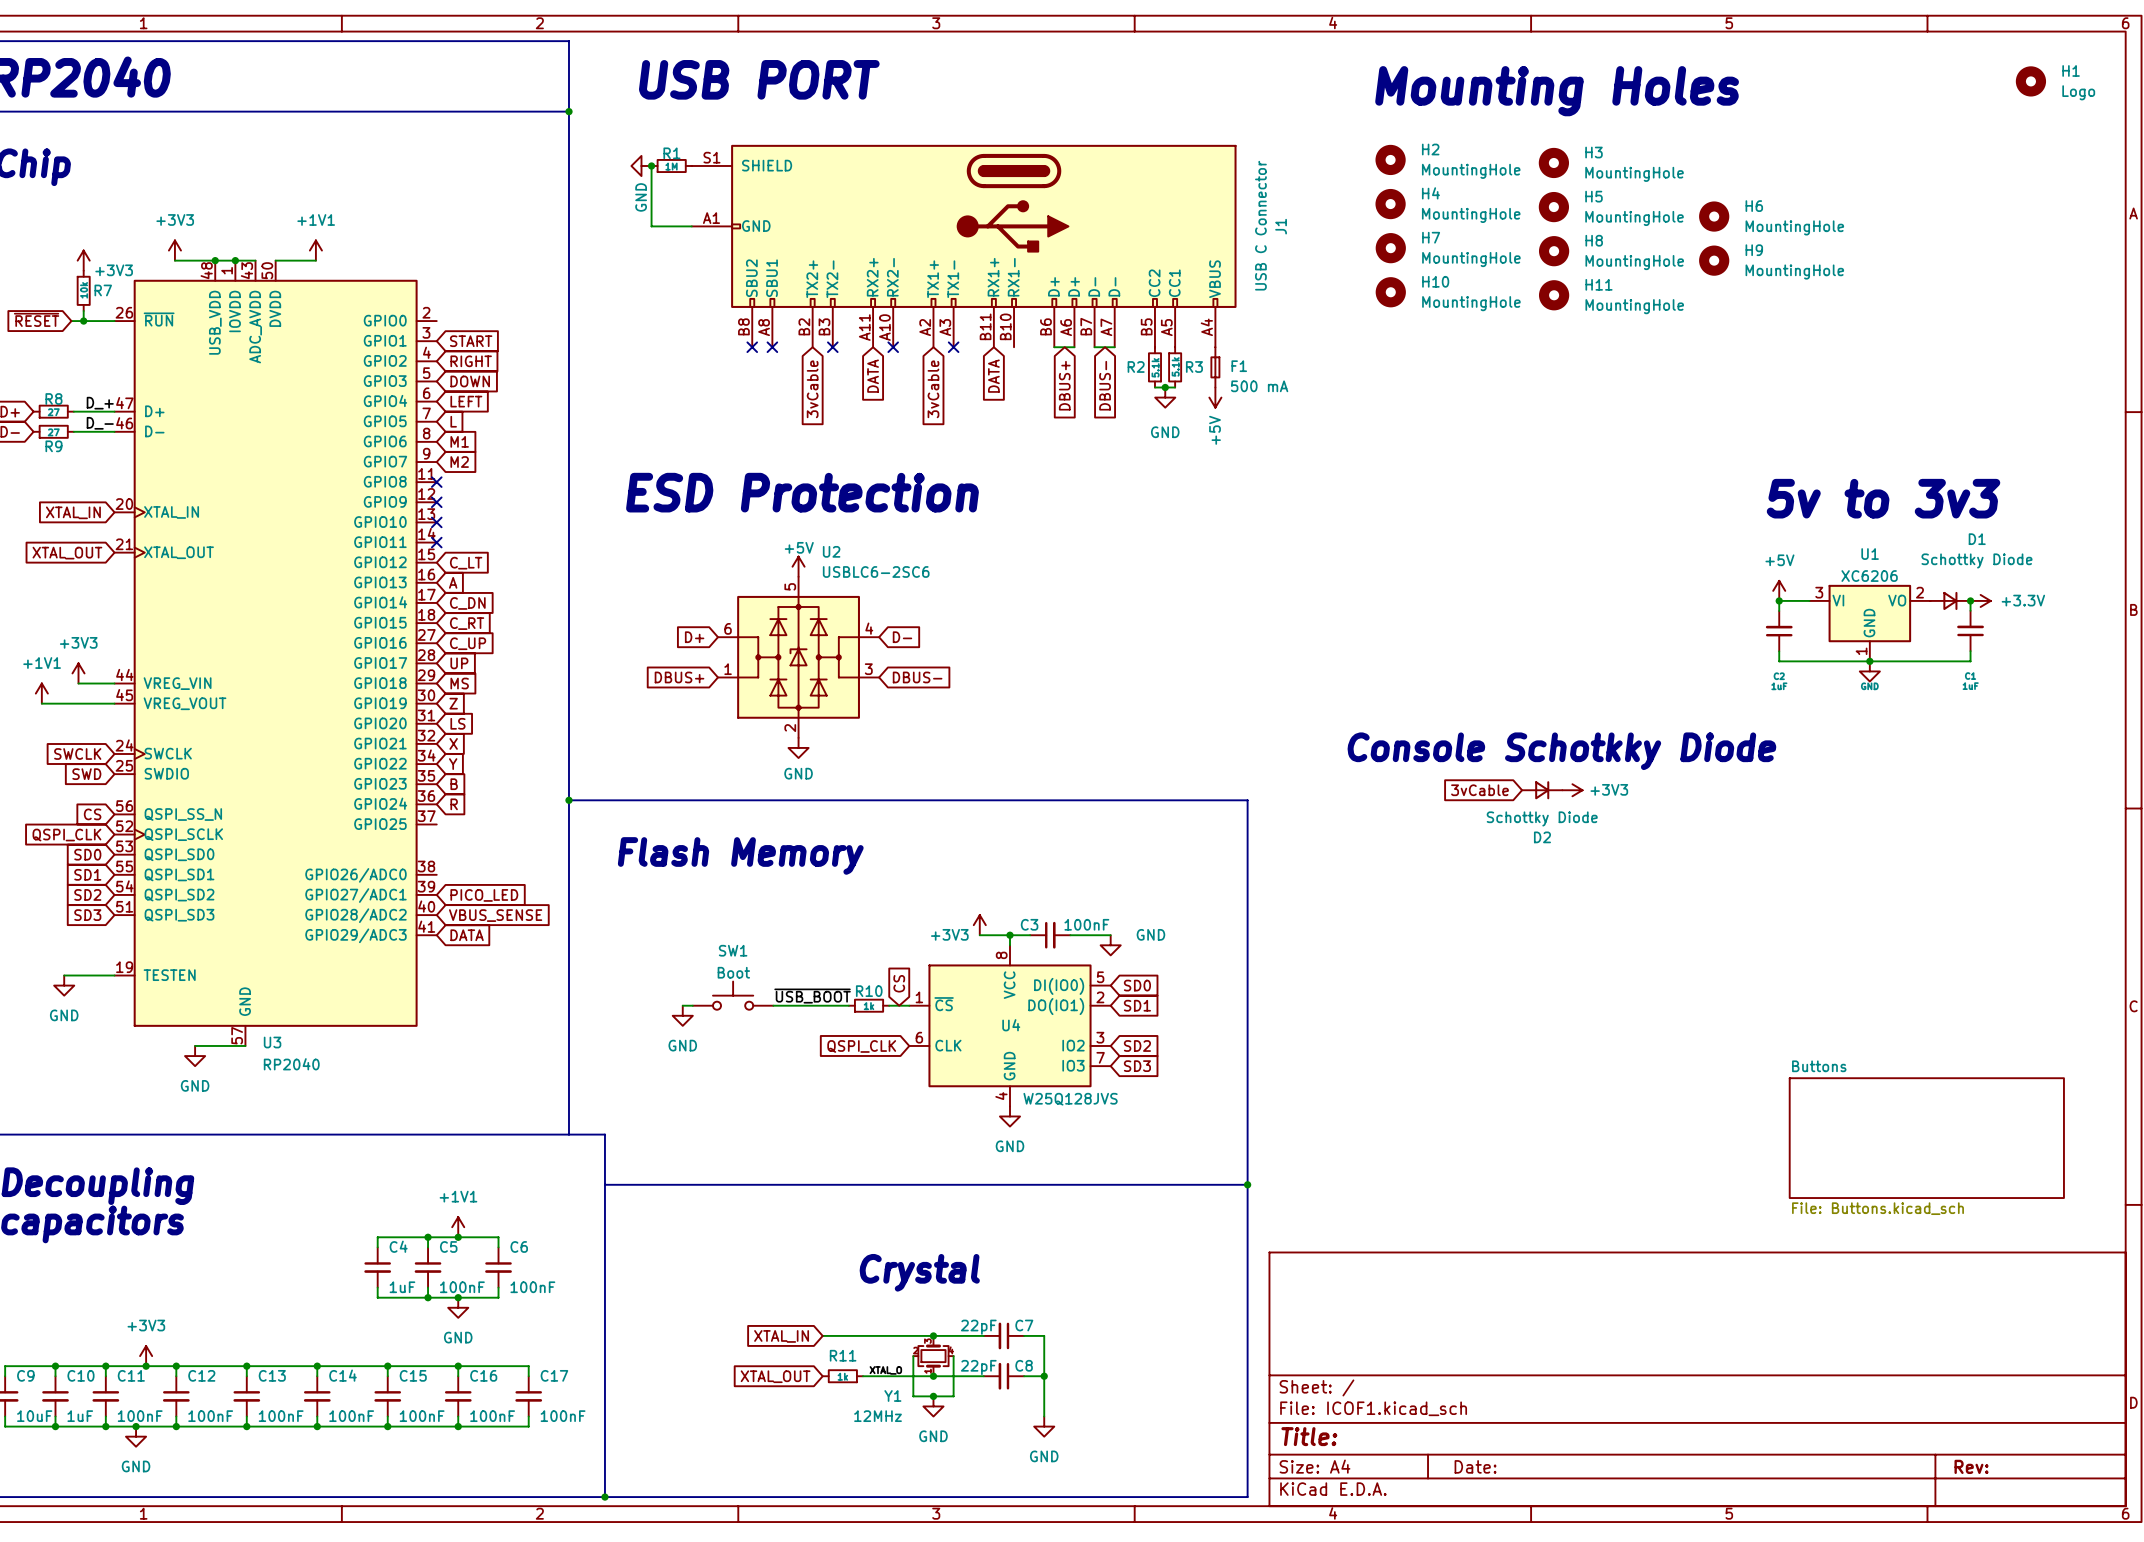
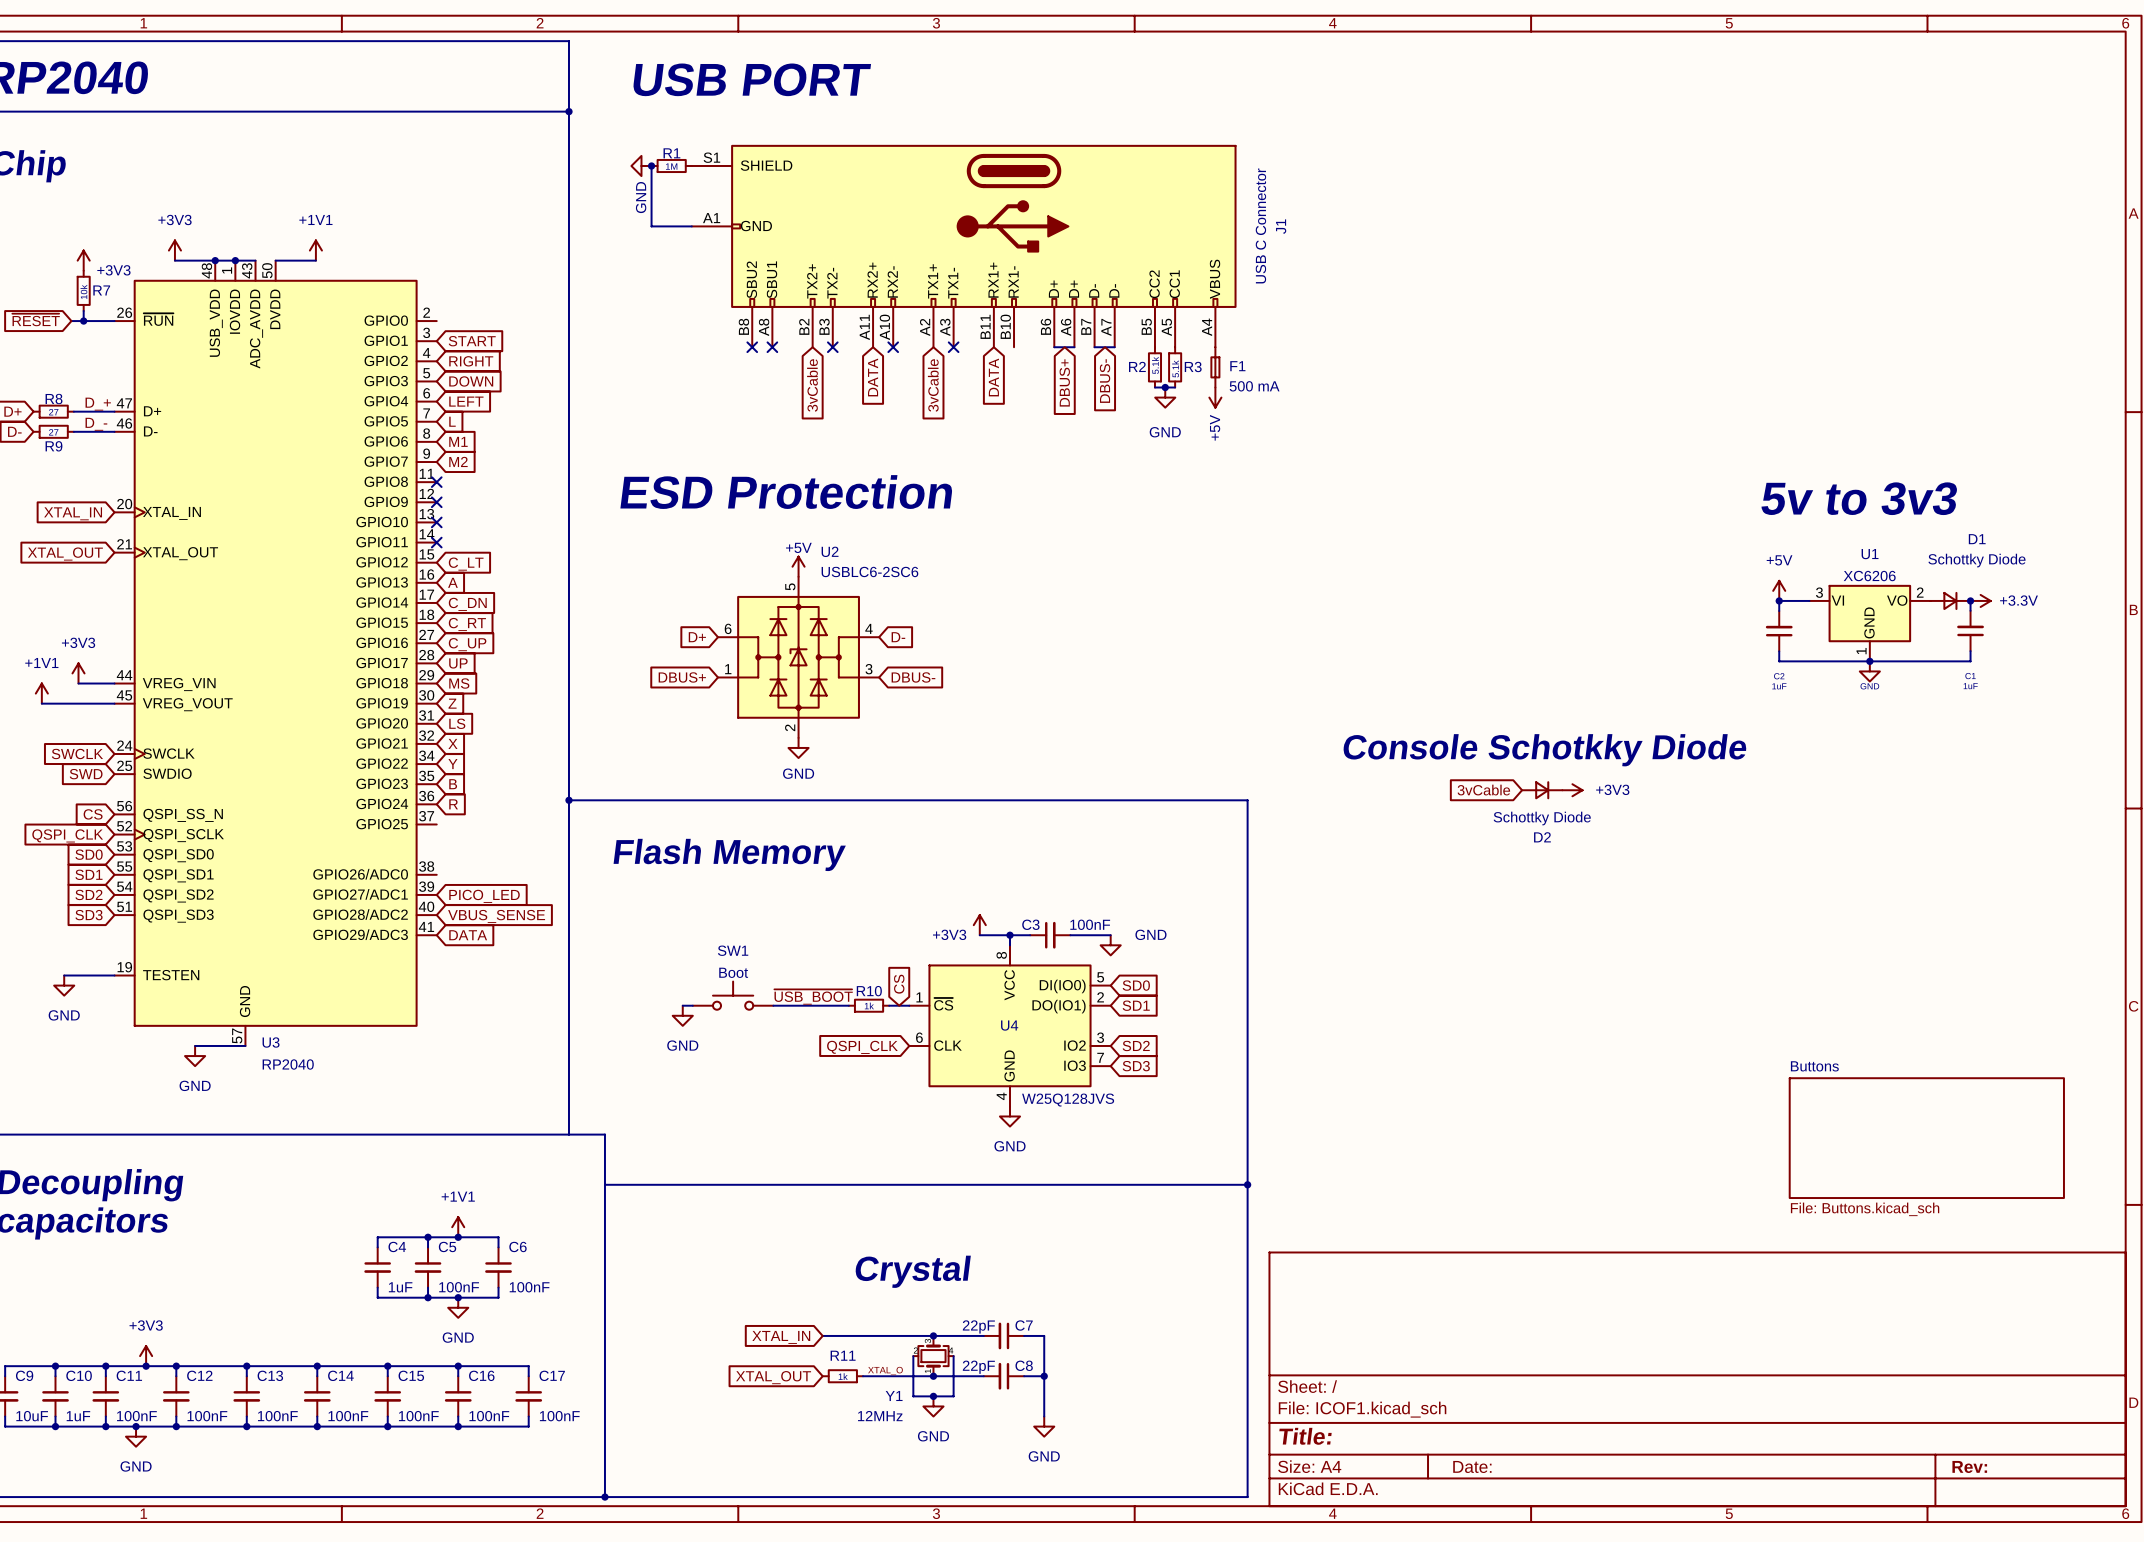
H1: Logo (2030, 81) -> none
text: Mounting Holes (1557, 91) -> none
H2: MountingHole (1390, 159) -> none
H3: MountingHole (1553, 162) -> none
H4: MountingHole (1390, 204) -> none
H5: MountingHole (1553, 207) -> none
H6: MountingHole (1714, 216) -> none
H7: MountingHole (1390, 248) -> none
H8: MountingHole (1554, 251) -> none
H9: MountingHole (1714, 260) -> none
H10: MountingHole (1390, 292) -> none
H11: MountingHole (1554, 295) -> none

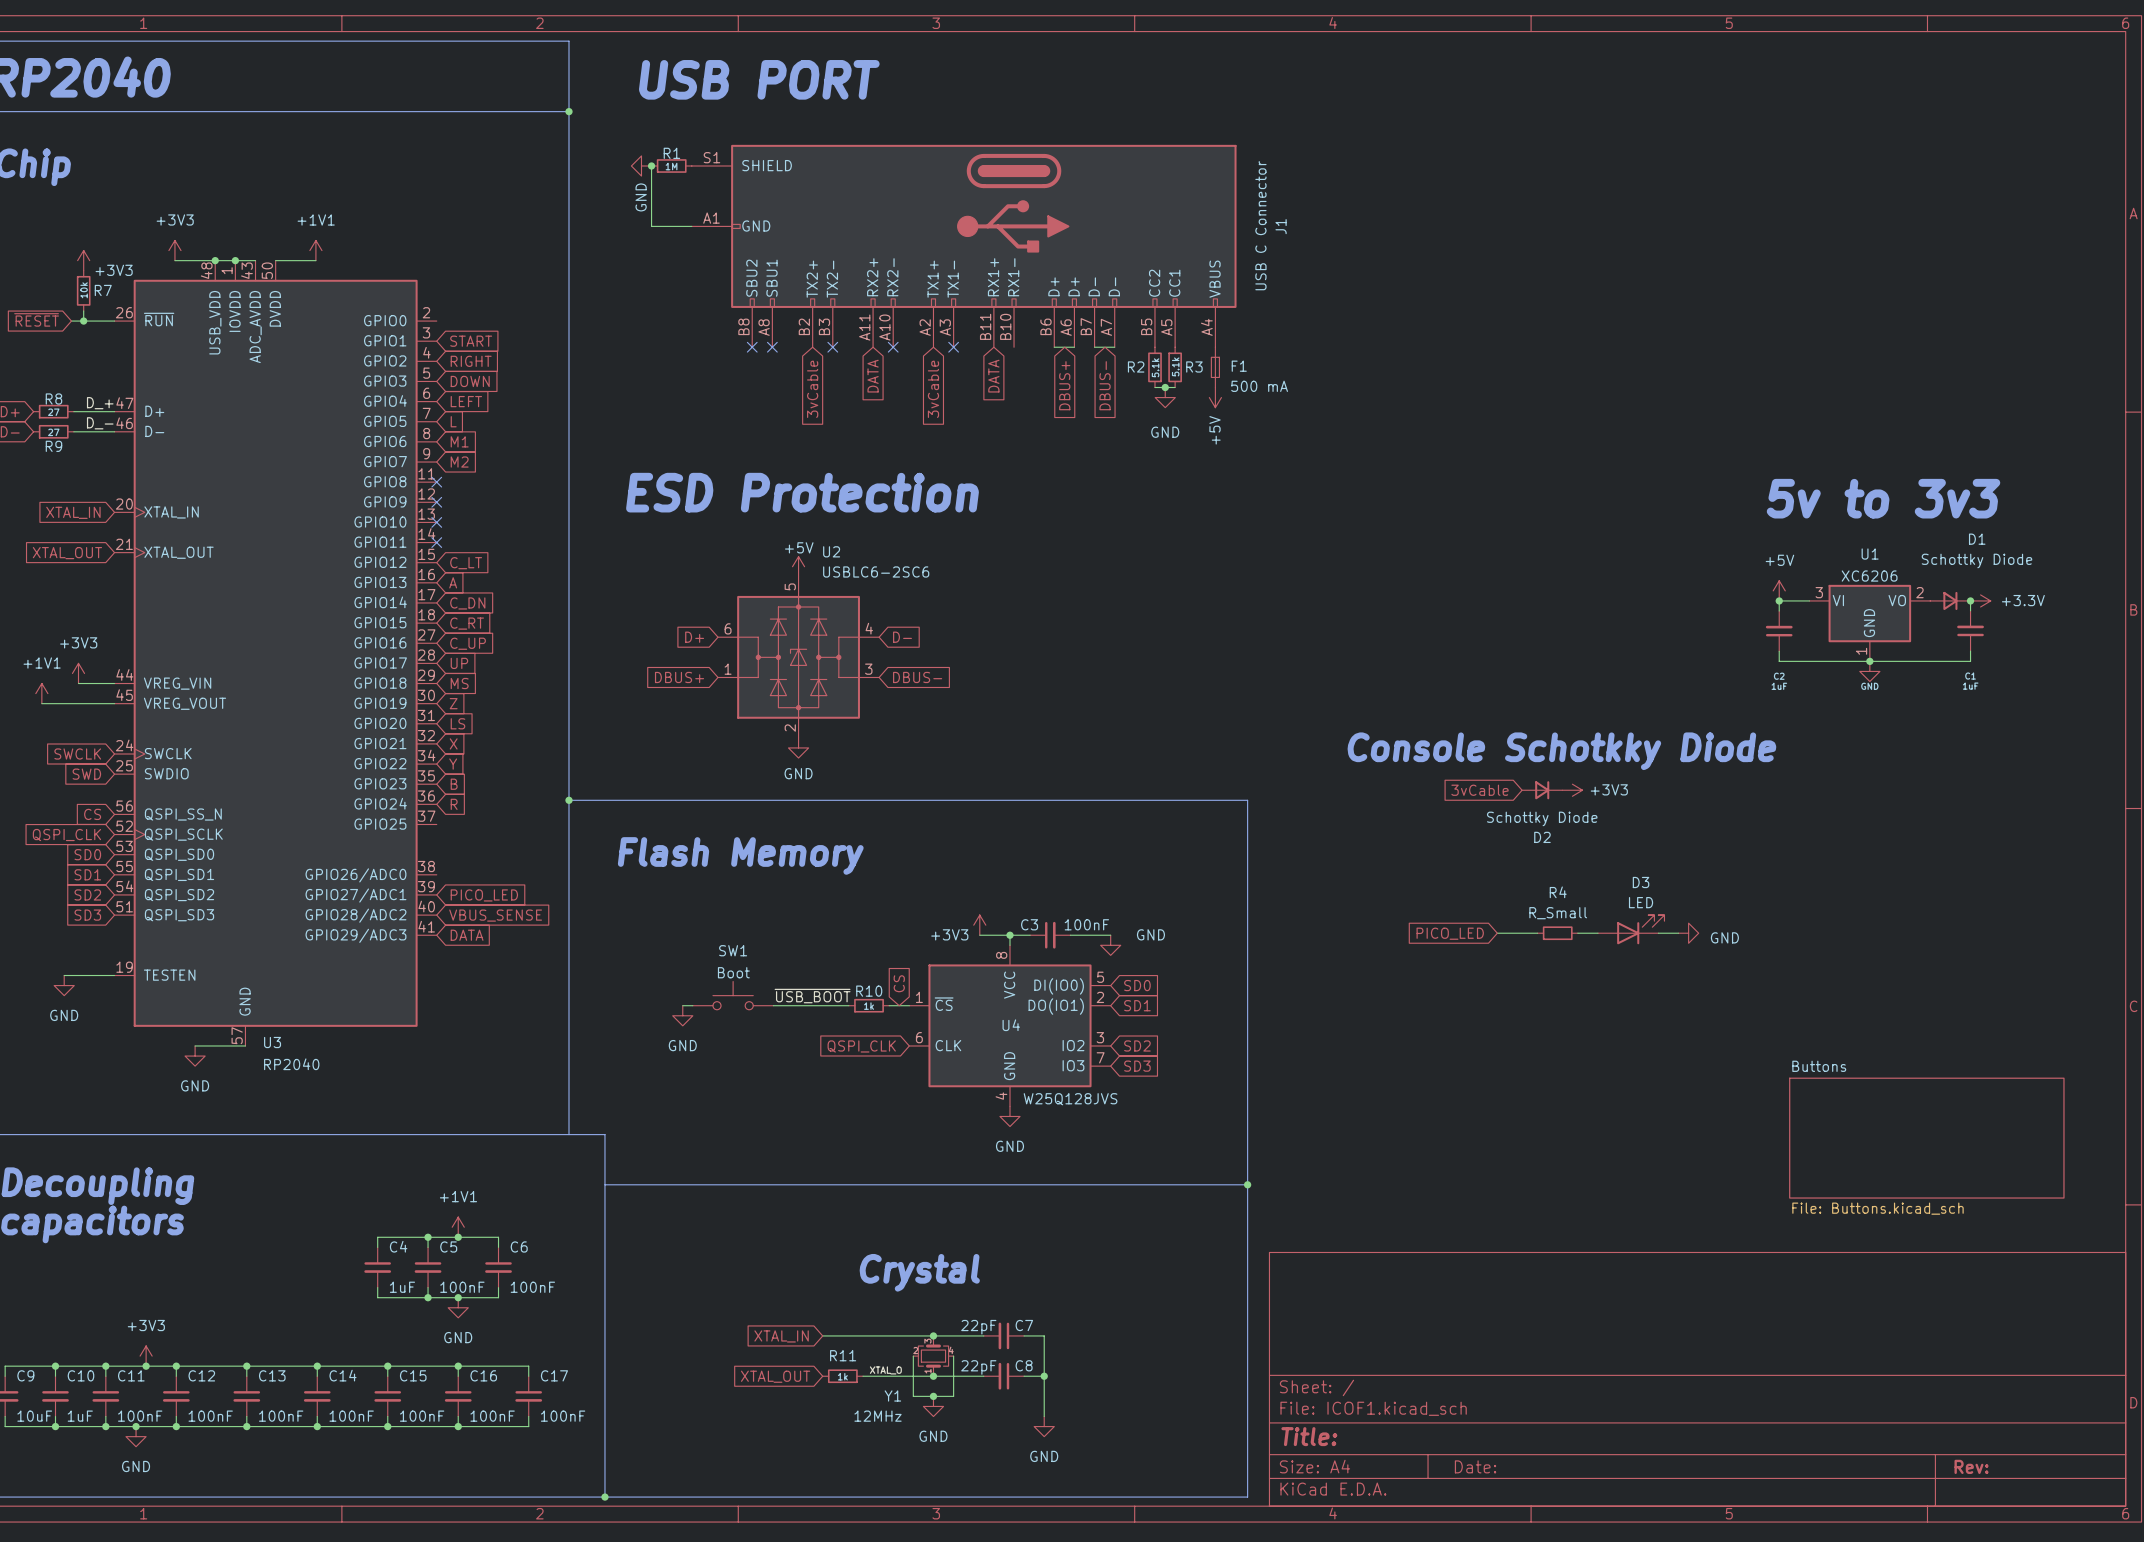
D3: none -> LED (1631, 929)
wire: none -> (1497, 933) (1537, 933)
R4: none -> R_Small (1557, 933)
wire: none -> (1577, 933) (1598, 933)
wire: none -> (1658, 933) (1678, 933)
power symbol: none -> GND (1688, 933)
global label: none -> PICO_LED (1450, 933)

